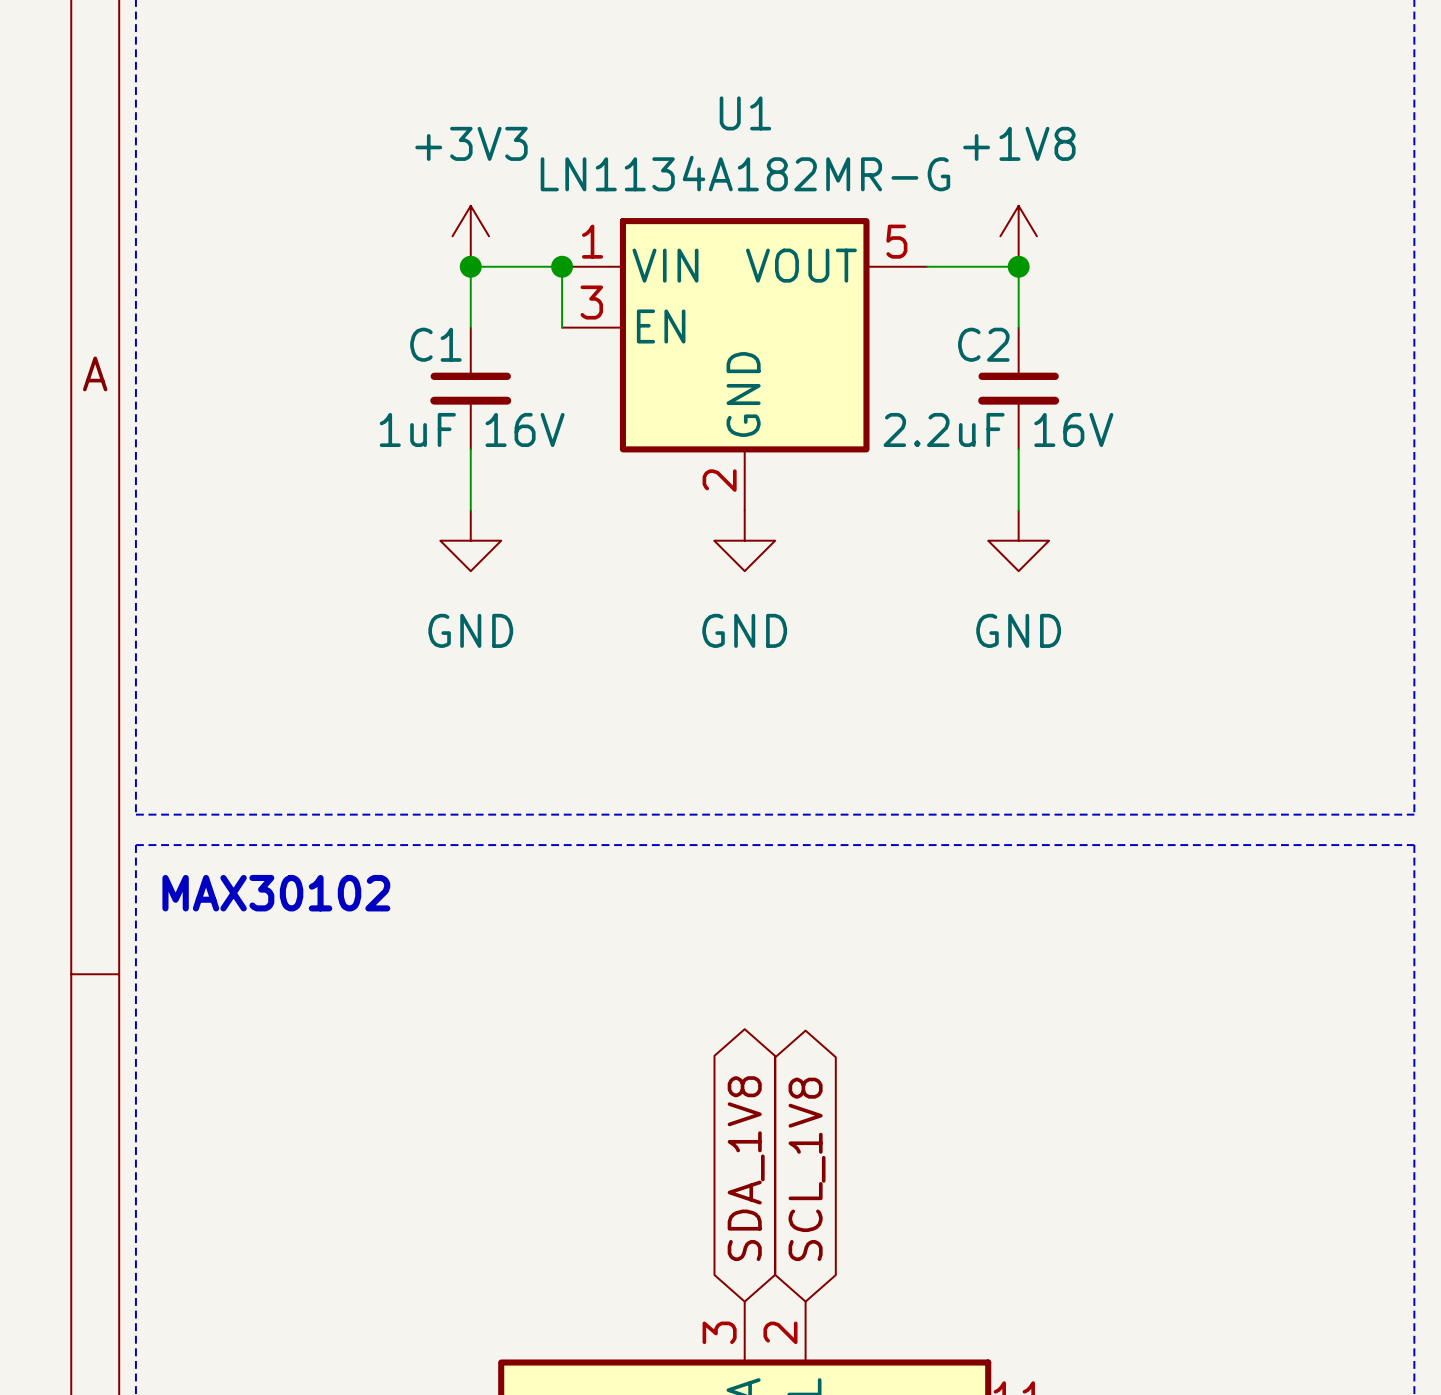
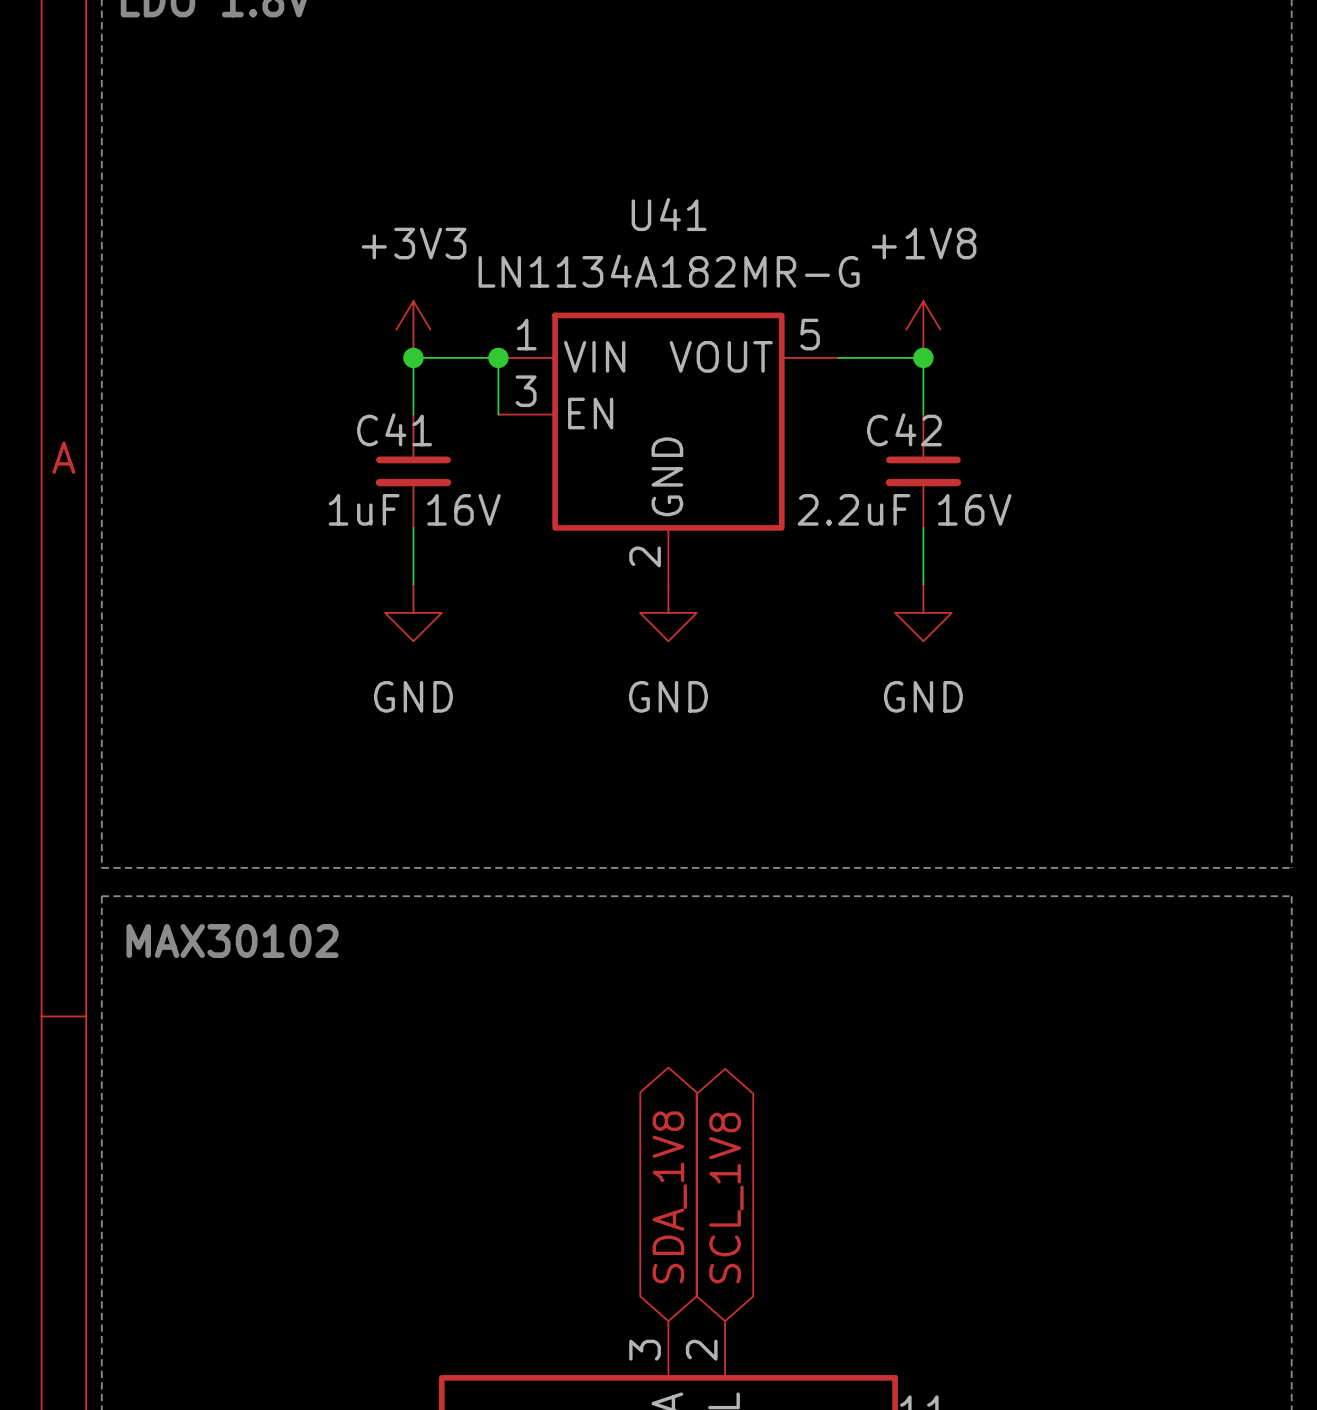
U1 name: U1 (745, 113) -> U41 (669, 214)
C1 name: C1 (435, 344) -> C41 (394, 429)
C2 name: C2 (983, 344) -> C42 (904, 429)

